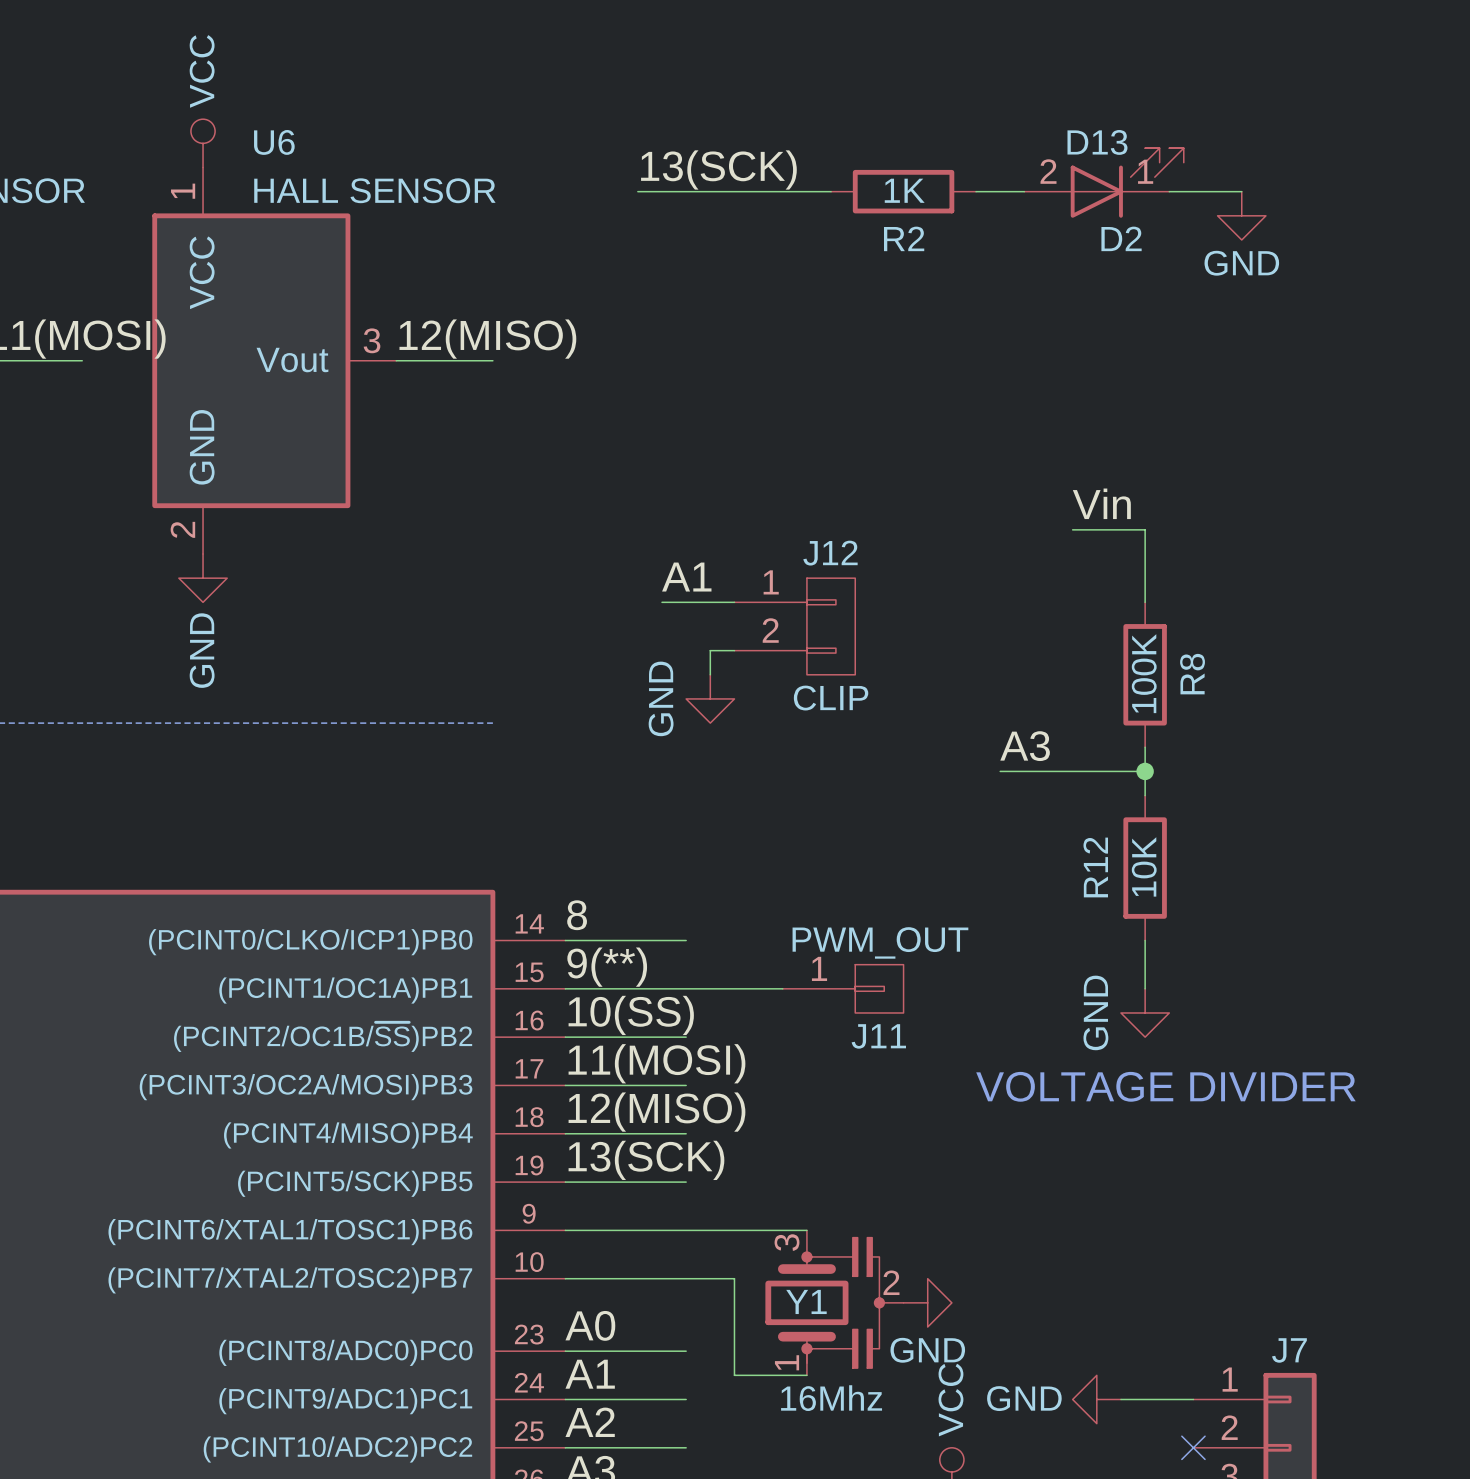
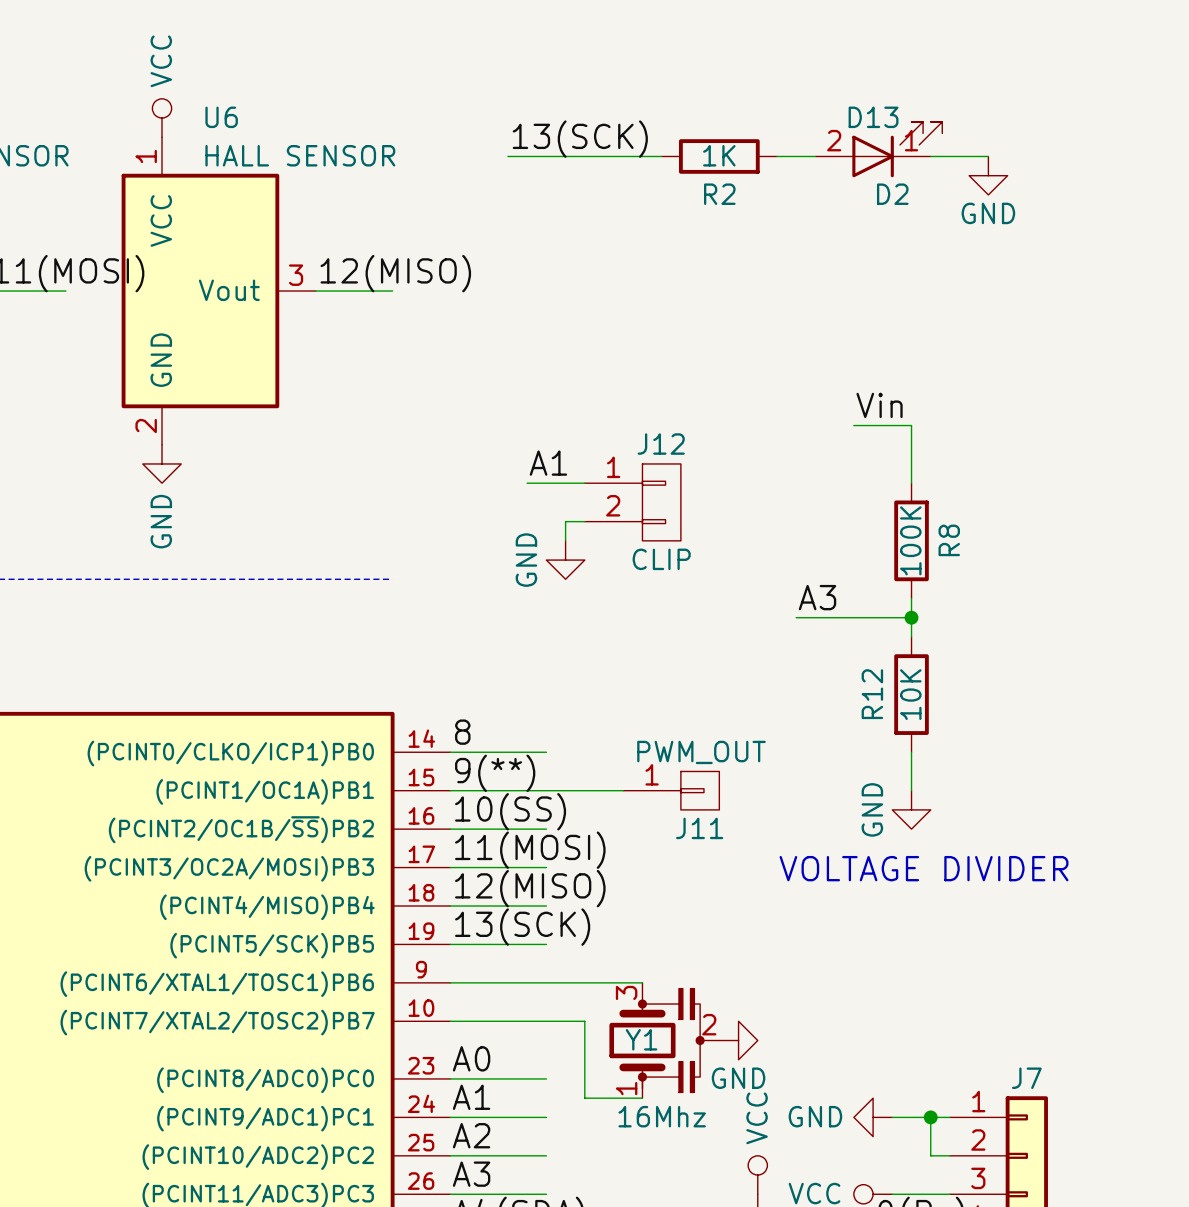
wire: none -> (930, 1117) (930, 1155) (949, 1155)
junction: none -> (930, 1117)
no-connect mark: (1193, 1447) -> none

